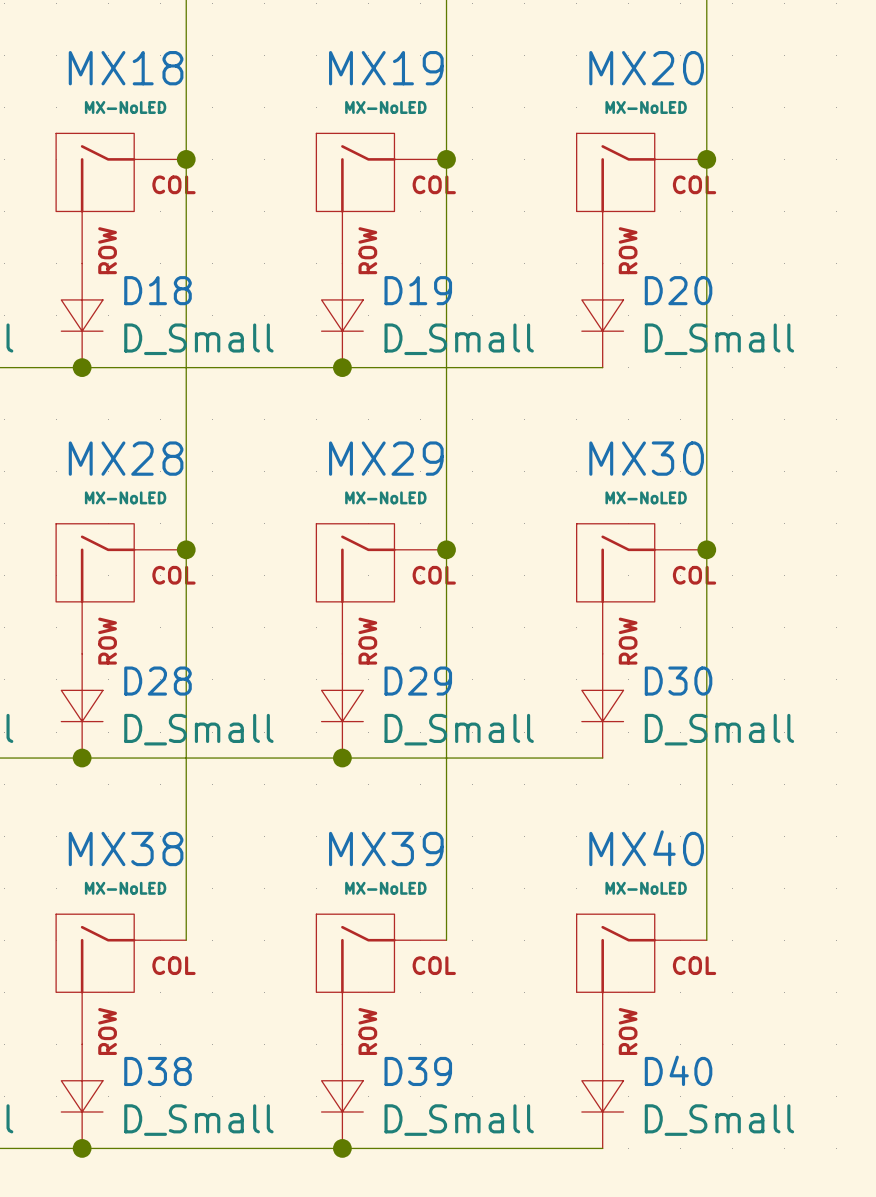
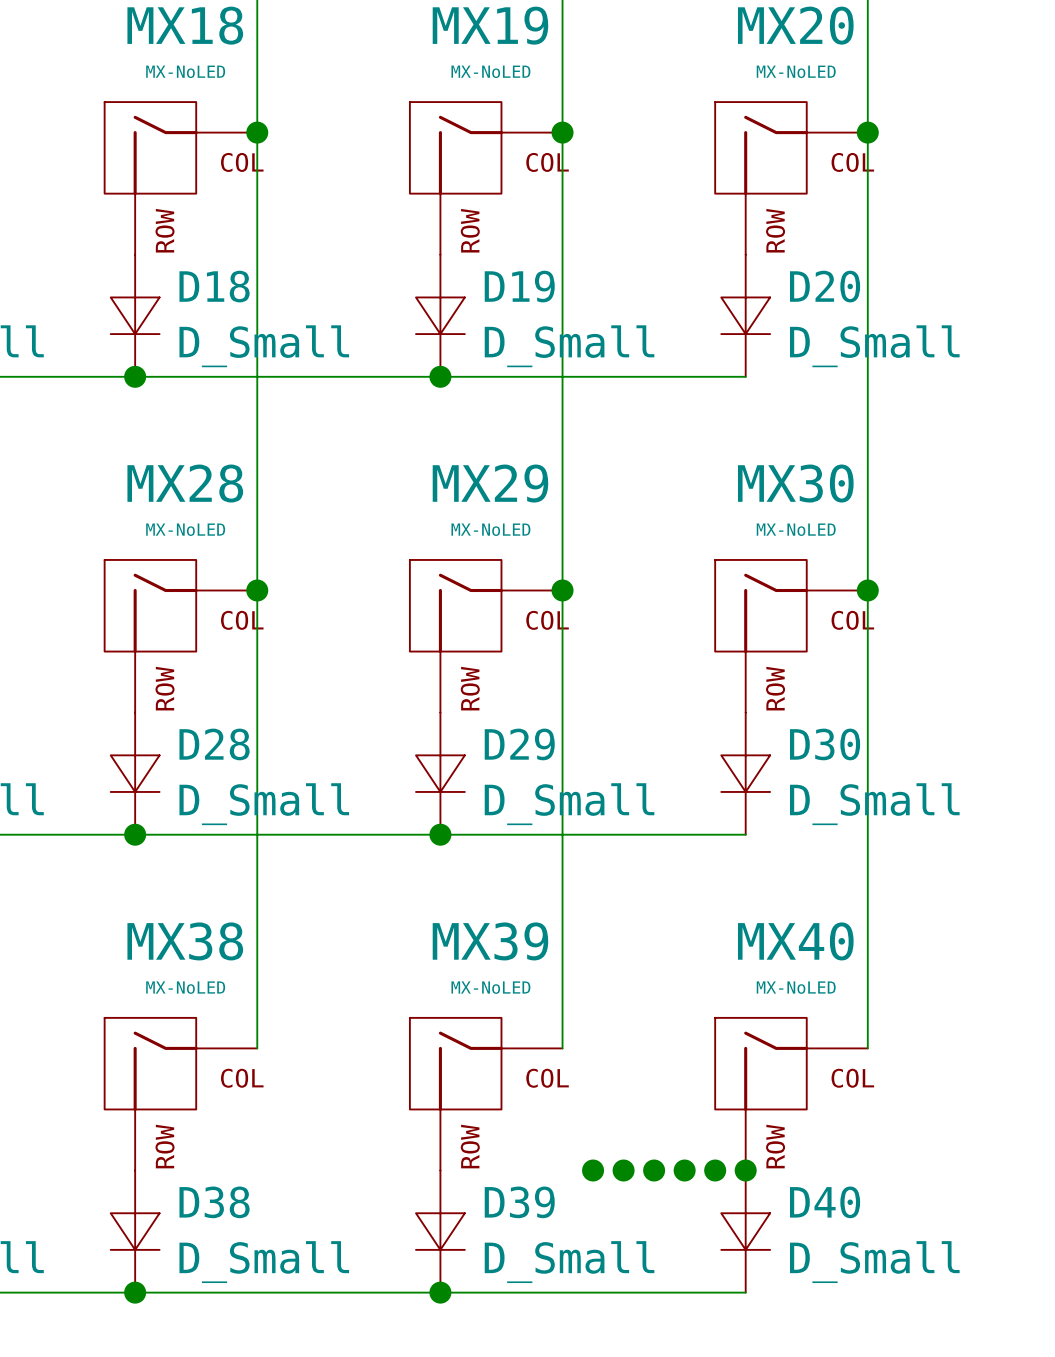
junction: none -> (593, 1170)
junction: none -> (623, 1170)
junction: none -> (654, 1170)
junction: none -> (684, 1170)
junction: none -> (715, 1170)
junction: none -> (745, 1170)

